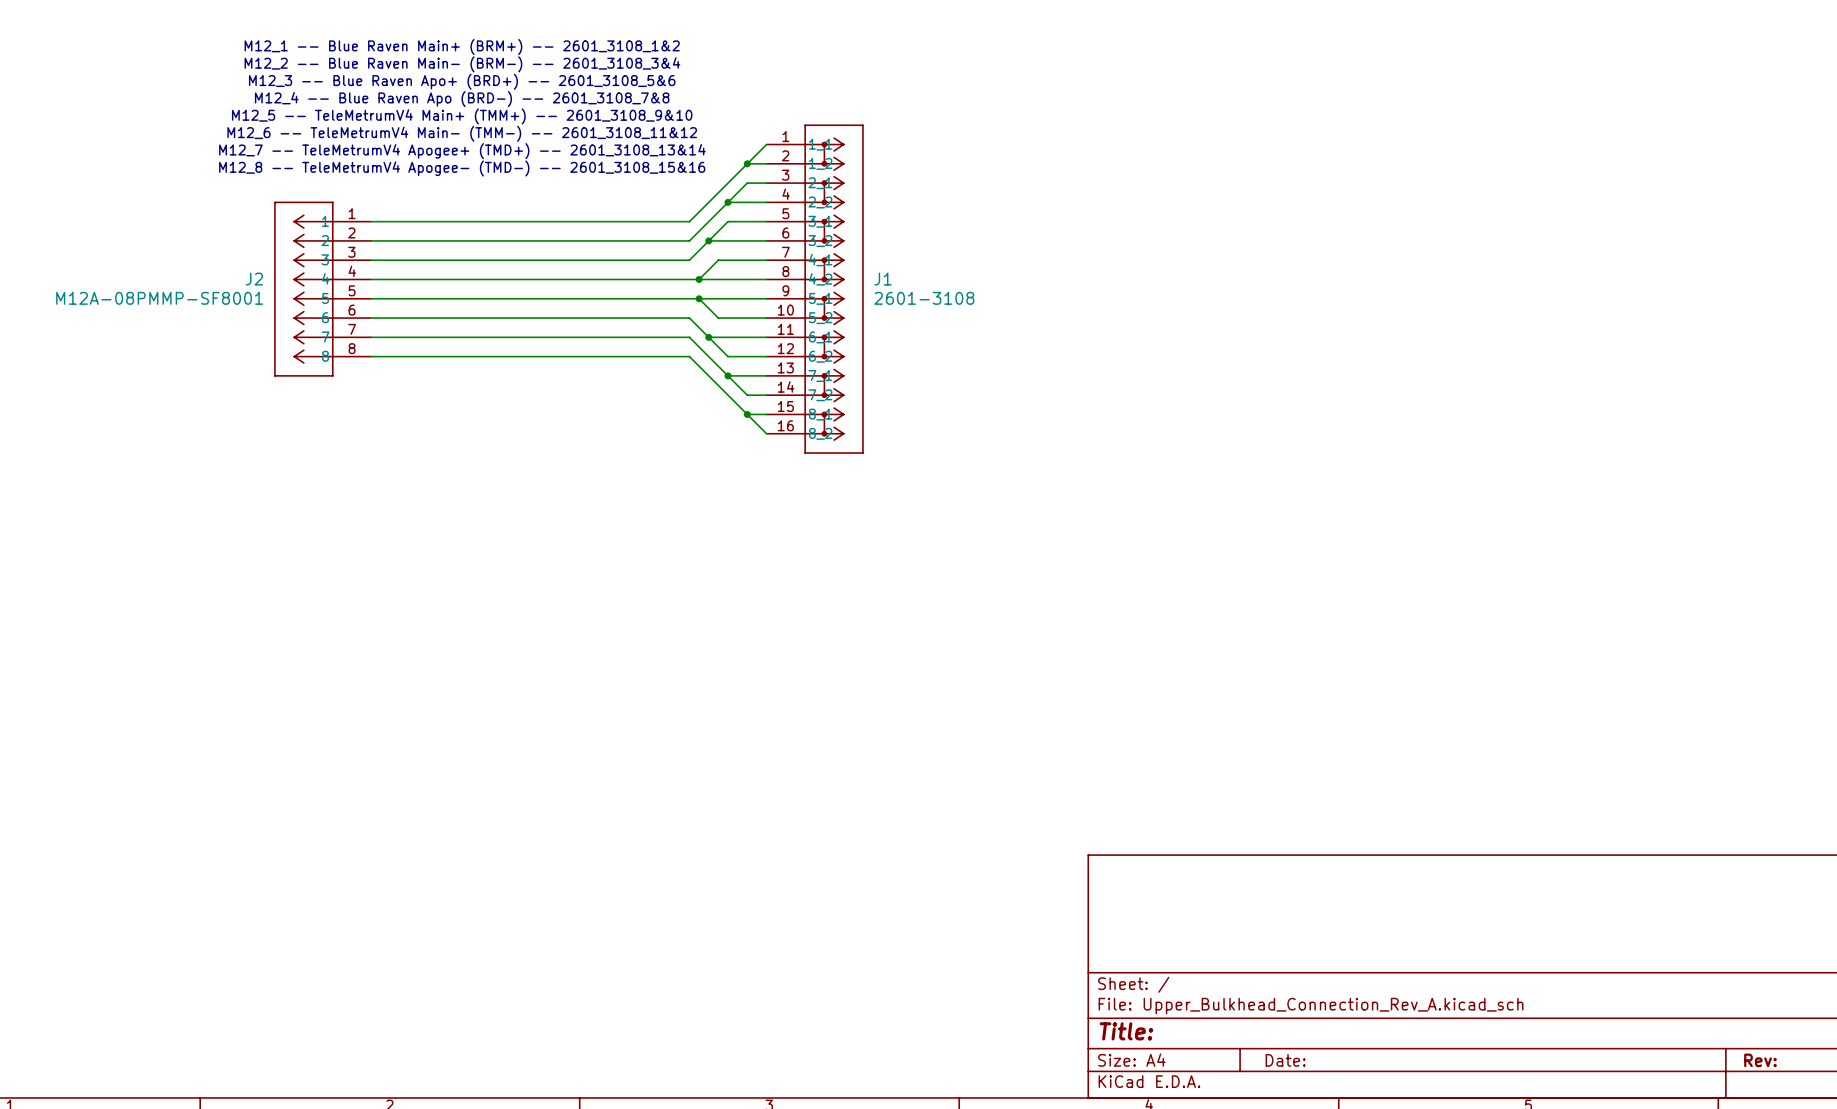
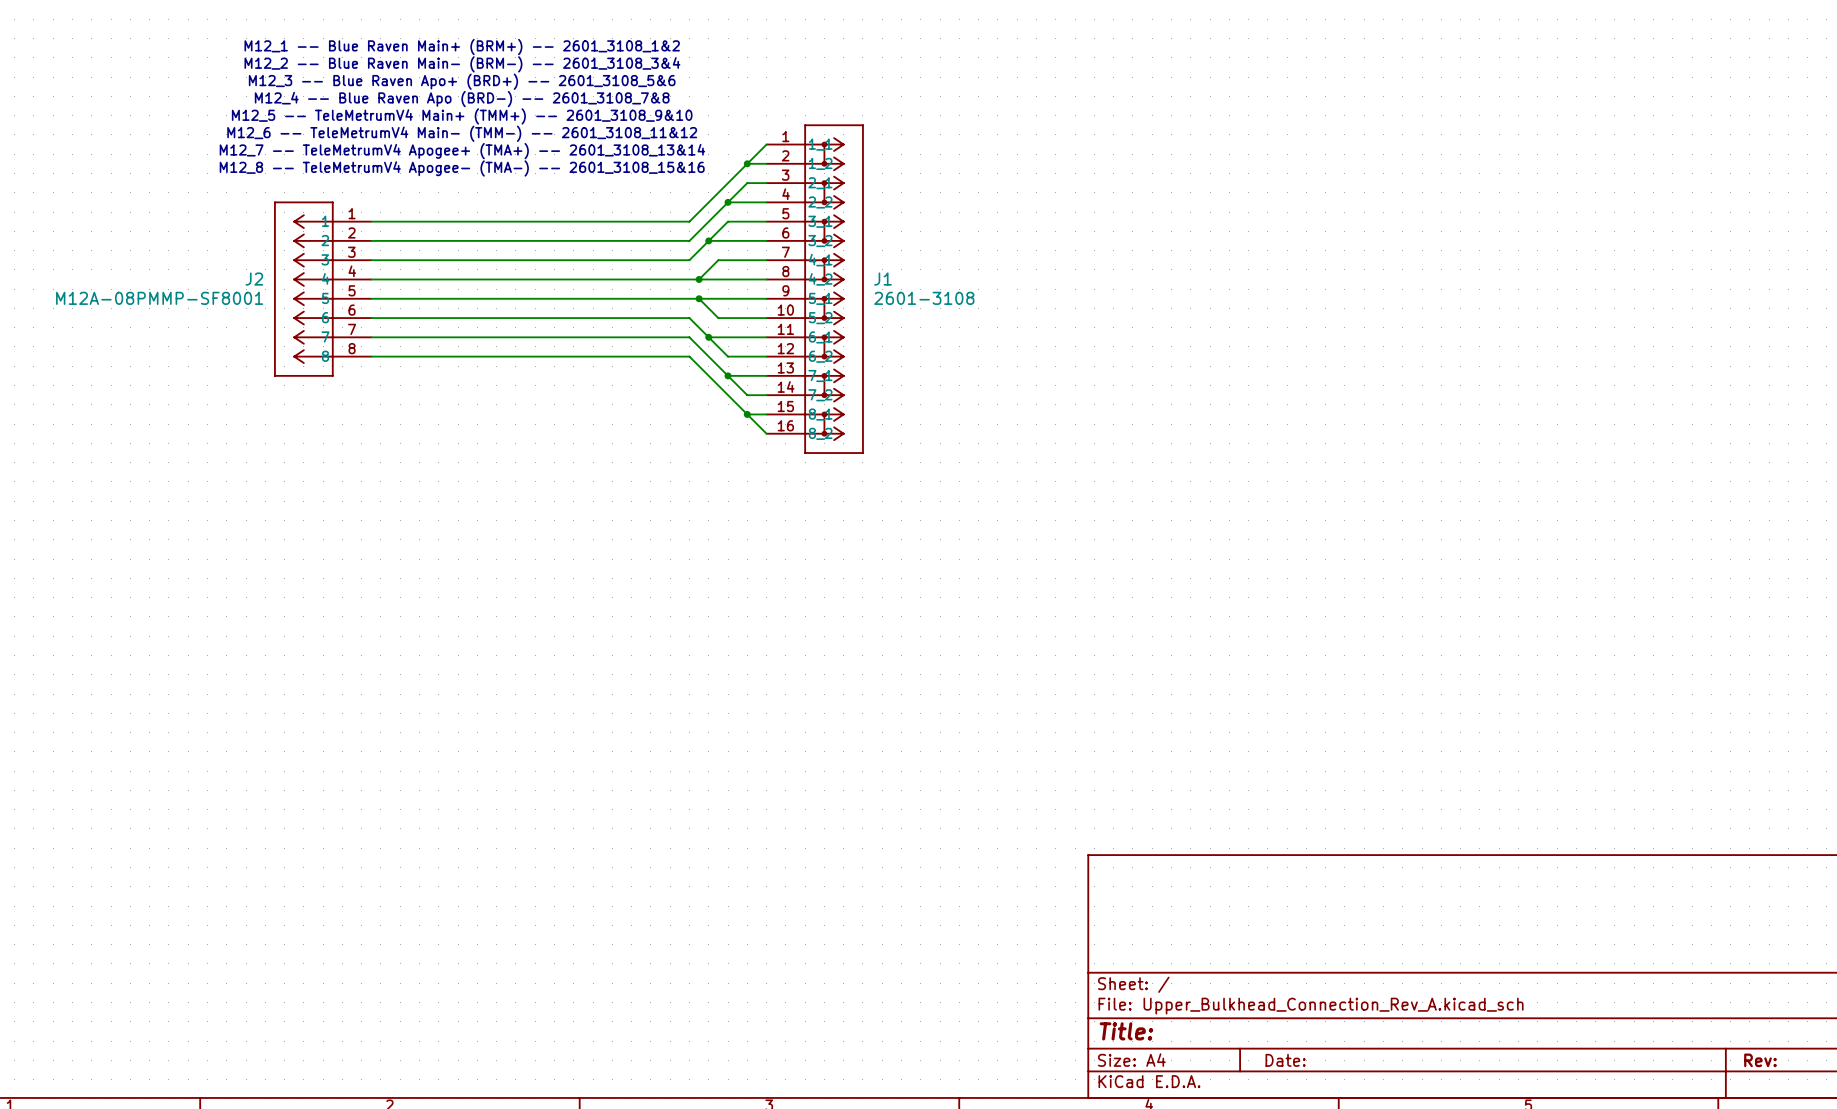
text: M12_7 -- TeleMetrumV4 Apogee+ (TMD+) -- 2601_3108_13&14 (462, 151) -> M12_7 -- TeleMetrumV4 Apogee+ (TMA+) -- 2601_3108_13&14 (462, 151)
text: M12_8 -- TeleMetrumV4 Apogee- (TMD-) -- 2601_3108_15&16 (462, 168) -> M12_8 -- TeleMetrumV4 Apogee- (TMA-) -- 2601_3108_15&16 (462, 168)

